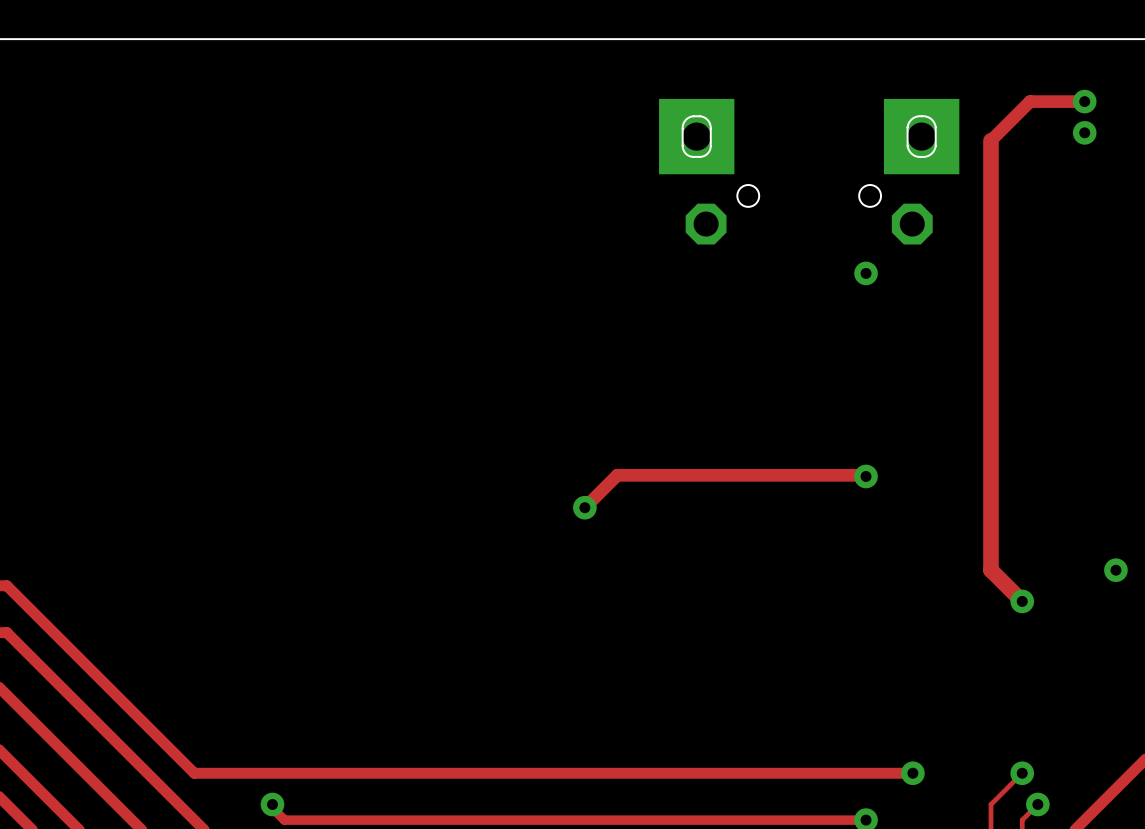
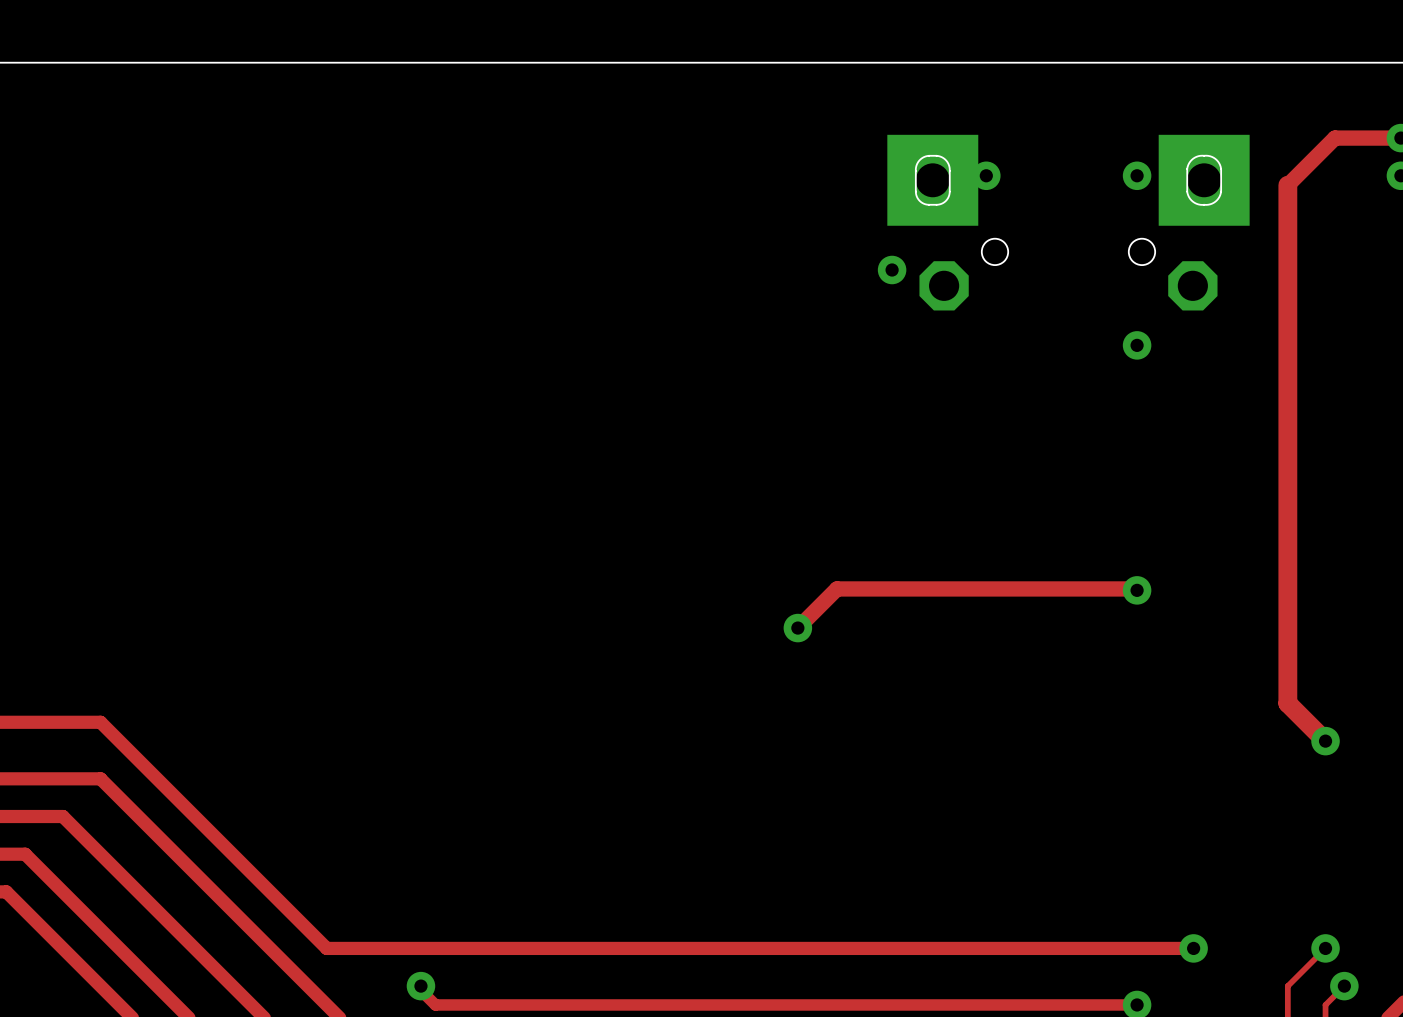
via: none -> (986, 175)
via: none -> (1137, 175)
via: none -> (892, 270)

